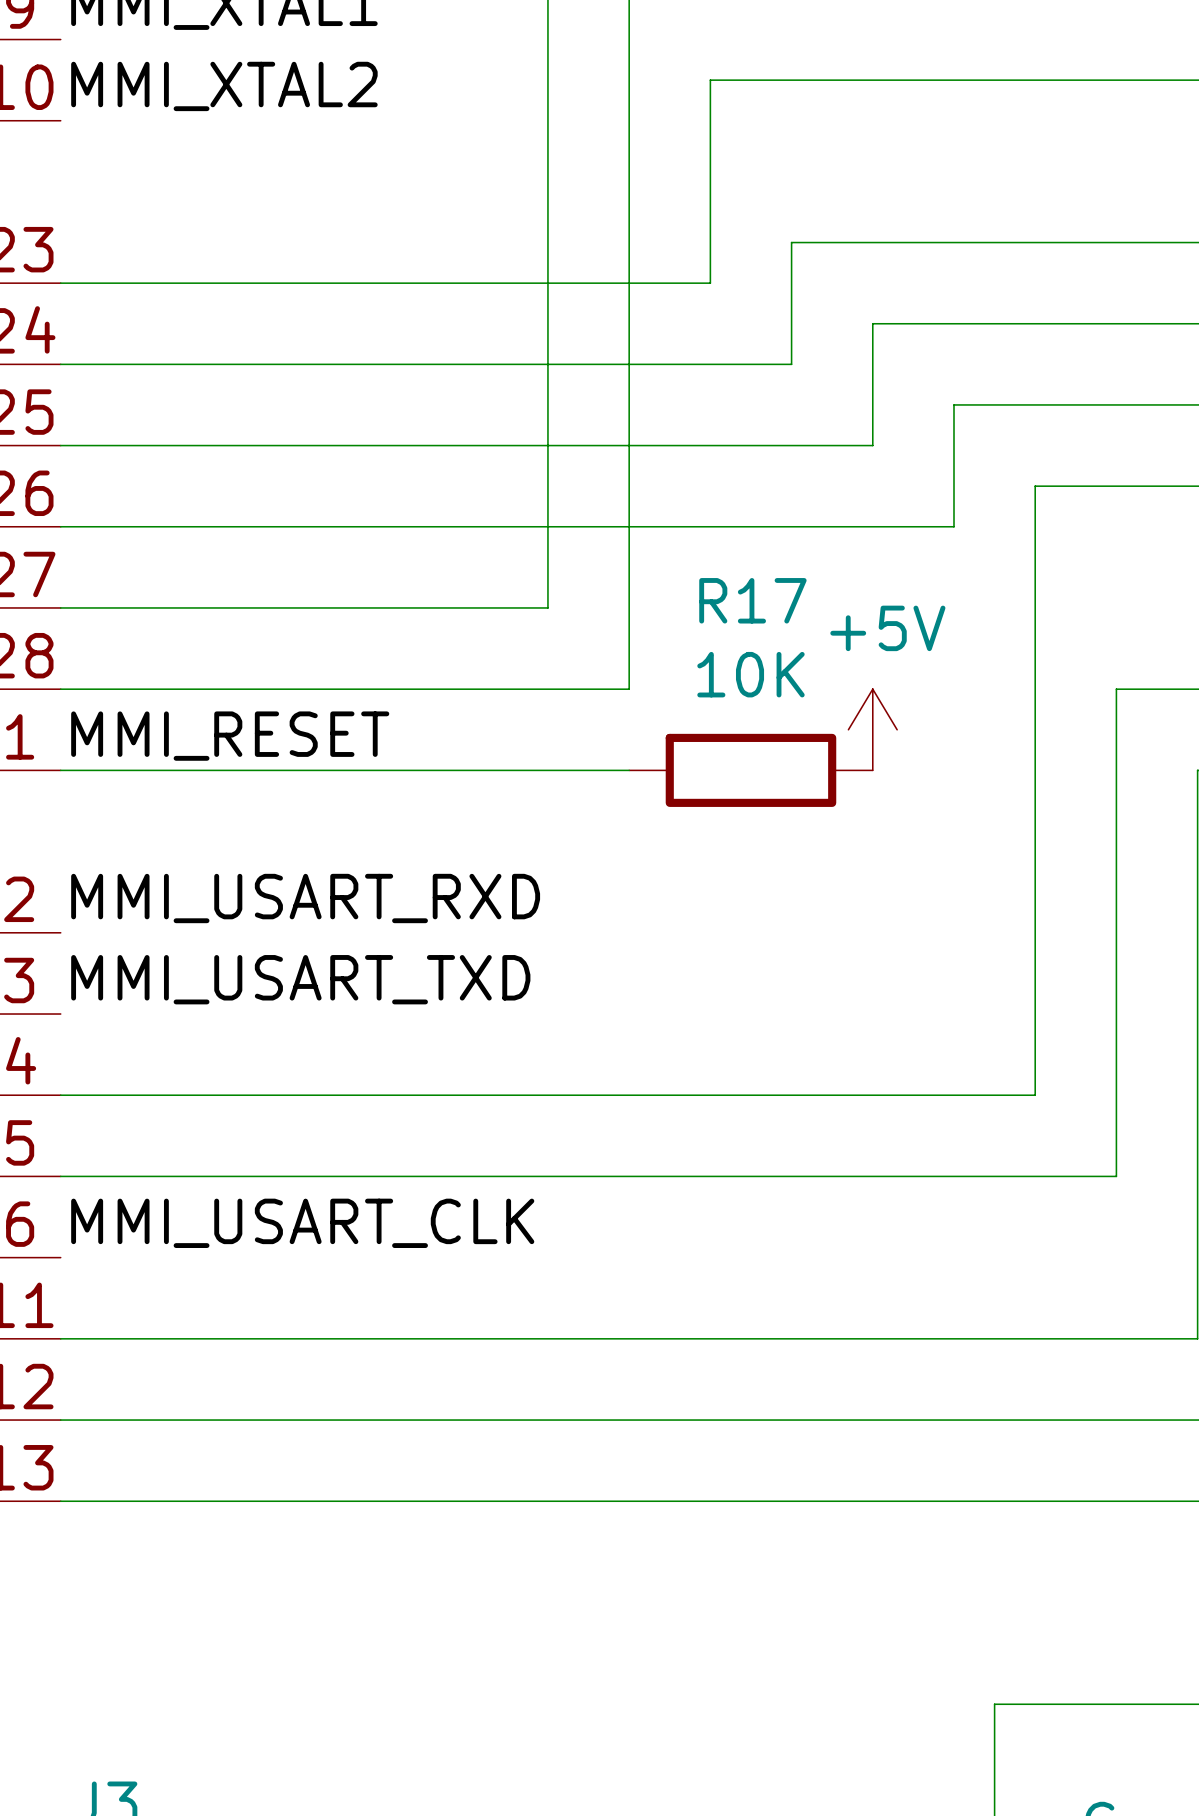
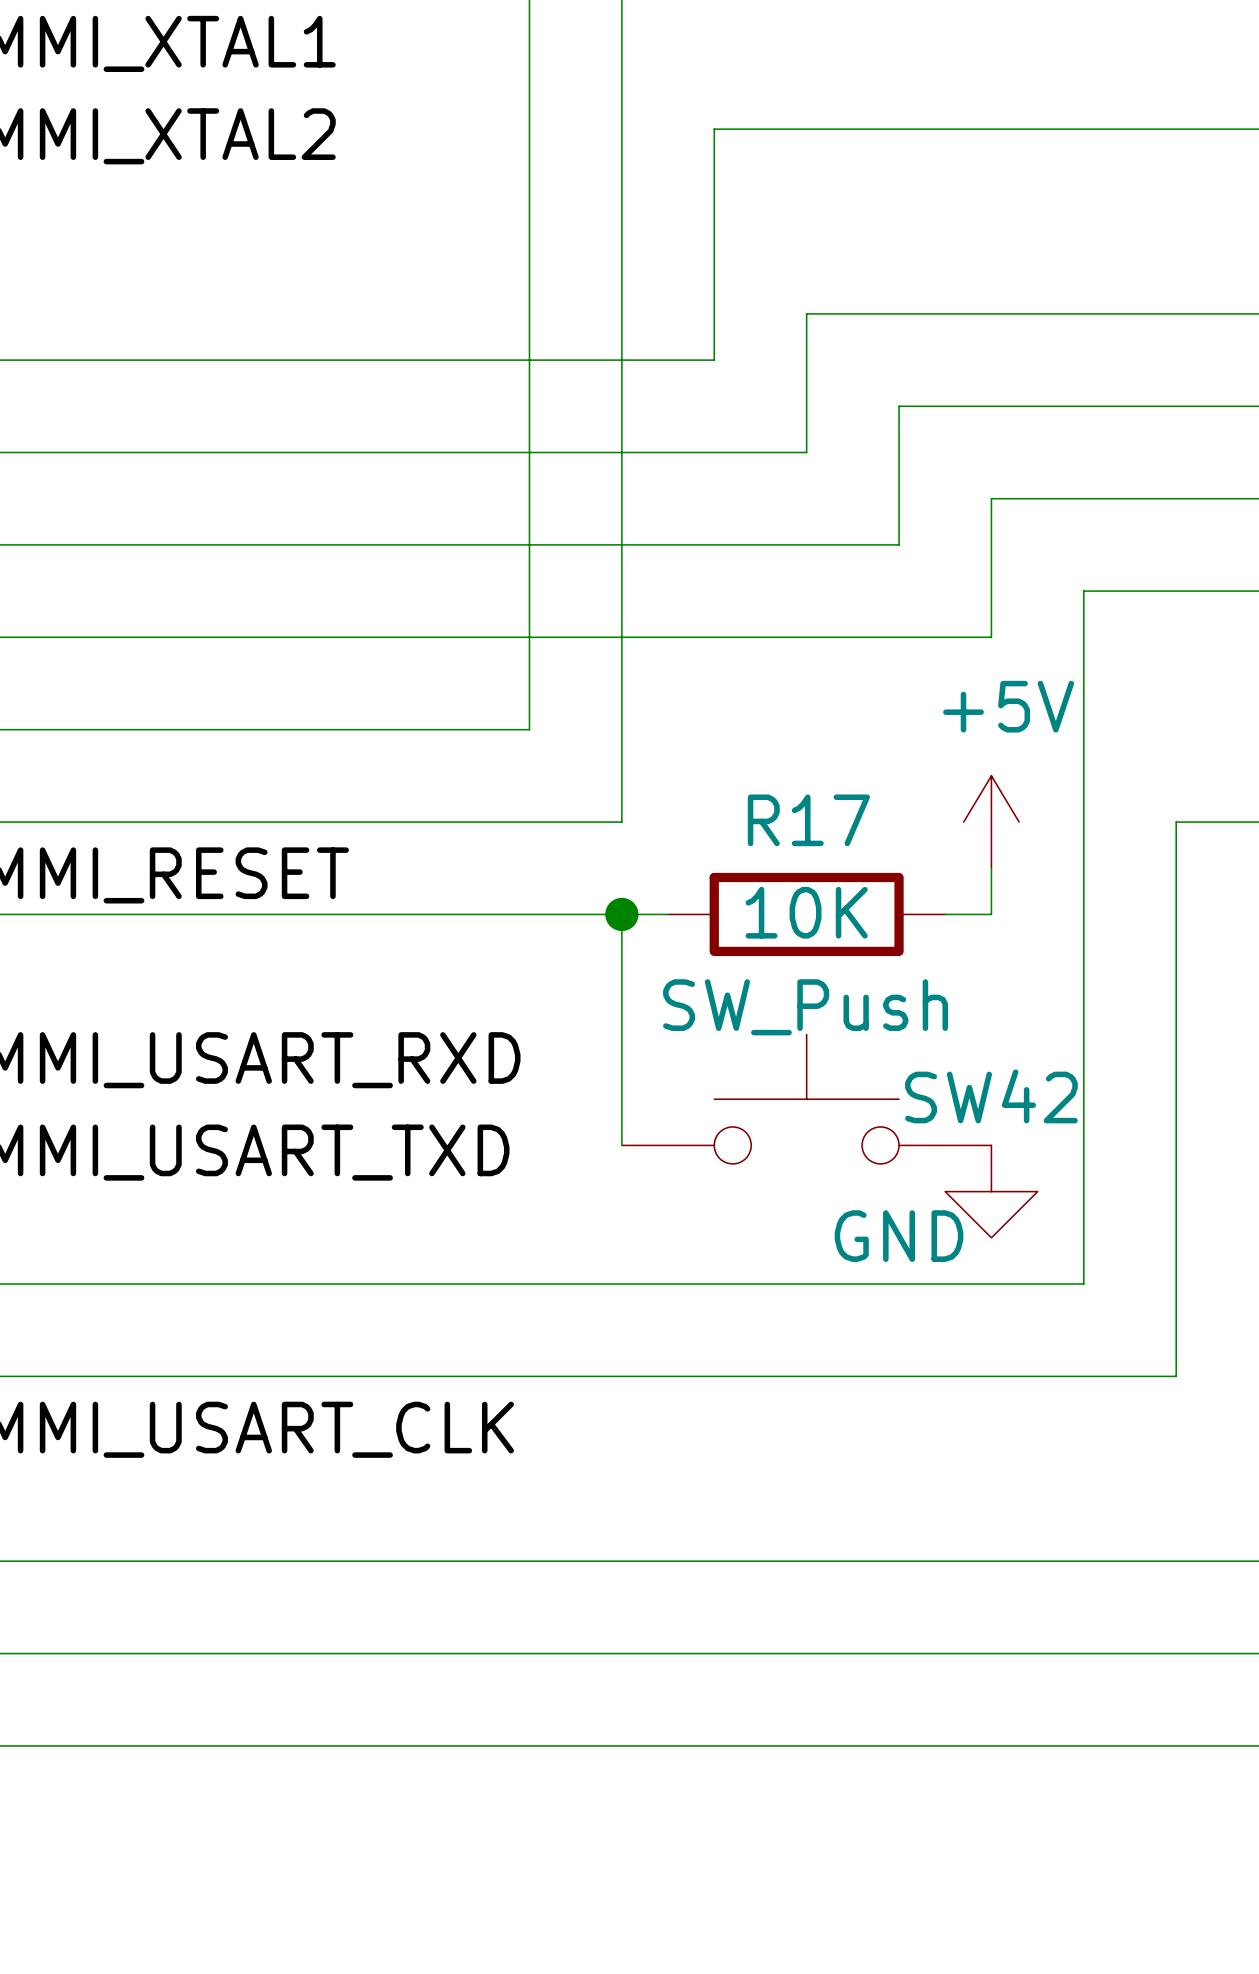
R17 name position: R17 (752, 600) -> R17 (808, 820)
R17 value position: 10K (750, 674) -> 10K (806, 912)
power symbol position: +5V (872, 729) -> +5V (991, 822)
wire: none -> (991, 868) (991, 914) (945, 914)
junction: none -> (621, 914)
wire: none -> (668, 914) (621, 914) (621, 1145)
R17 position: (750, 770) -> (806, 914)
SW42: none -> SW_Push (806, 1099)
power symbol: none -> GND (991, 1191)

